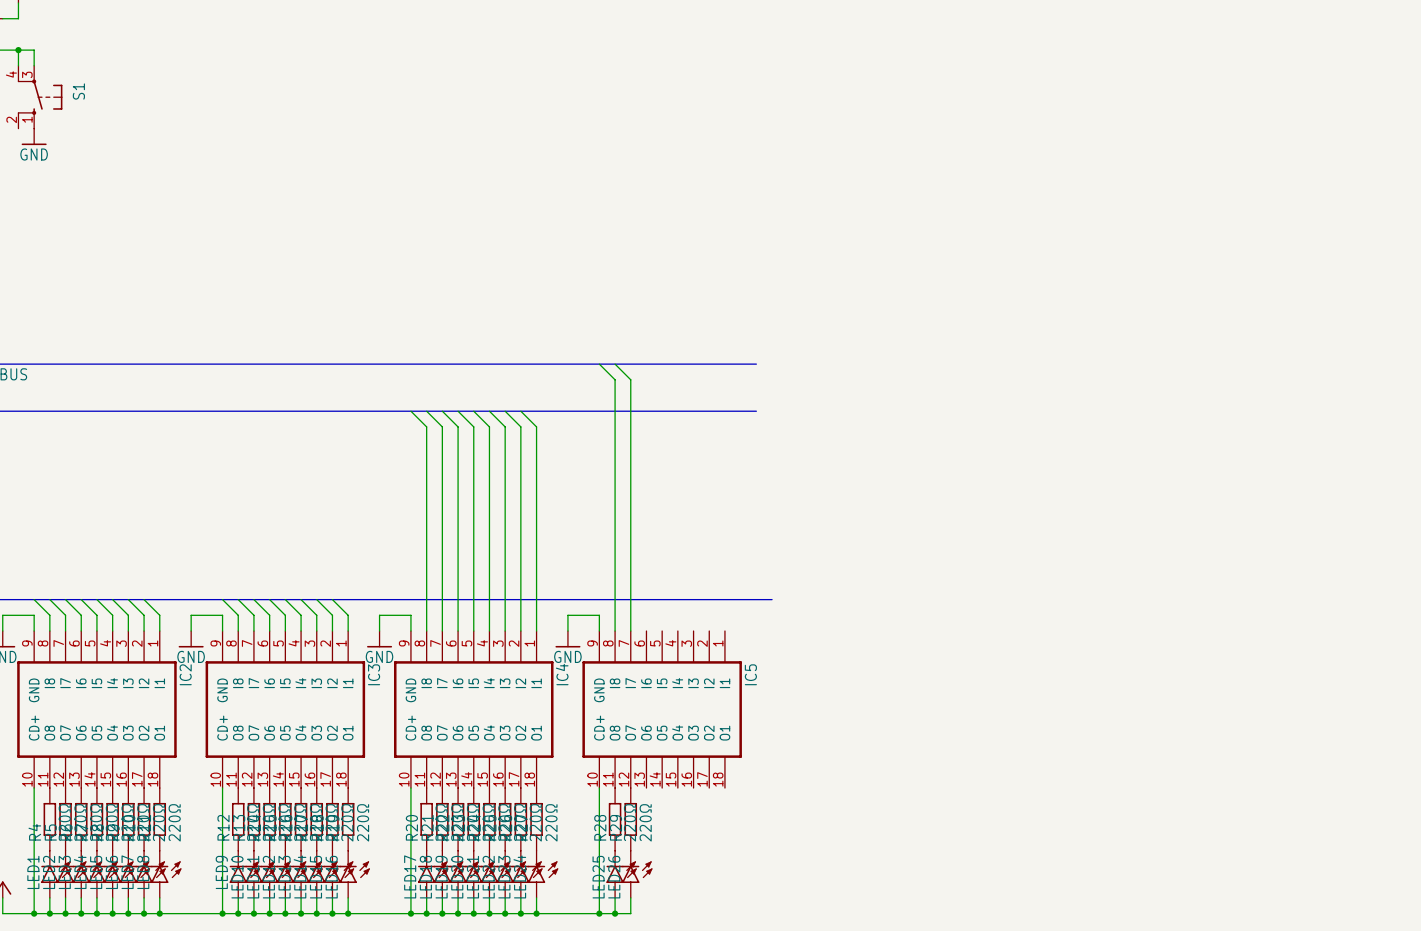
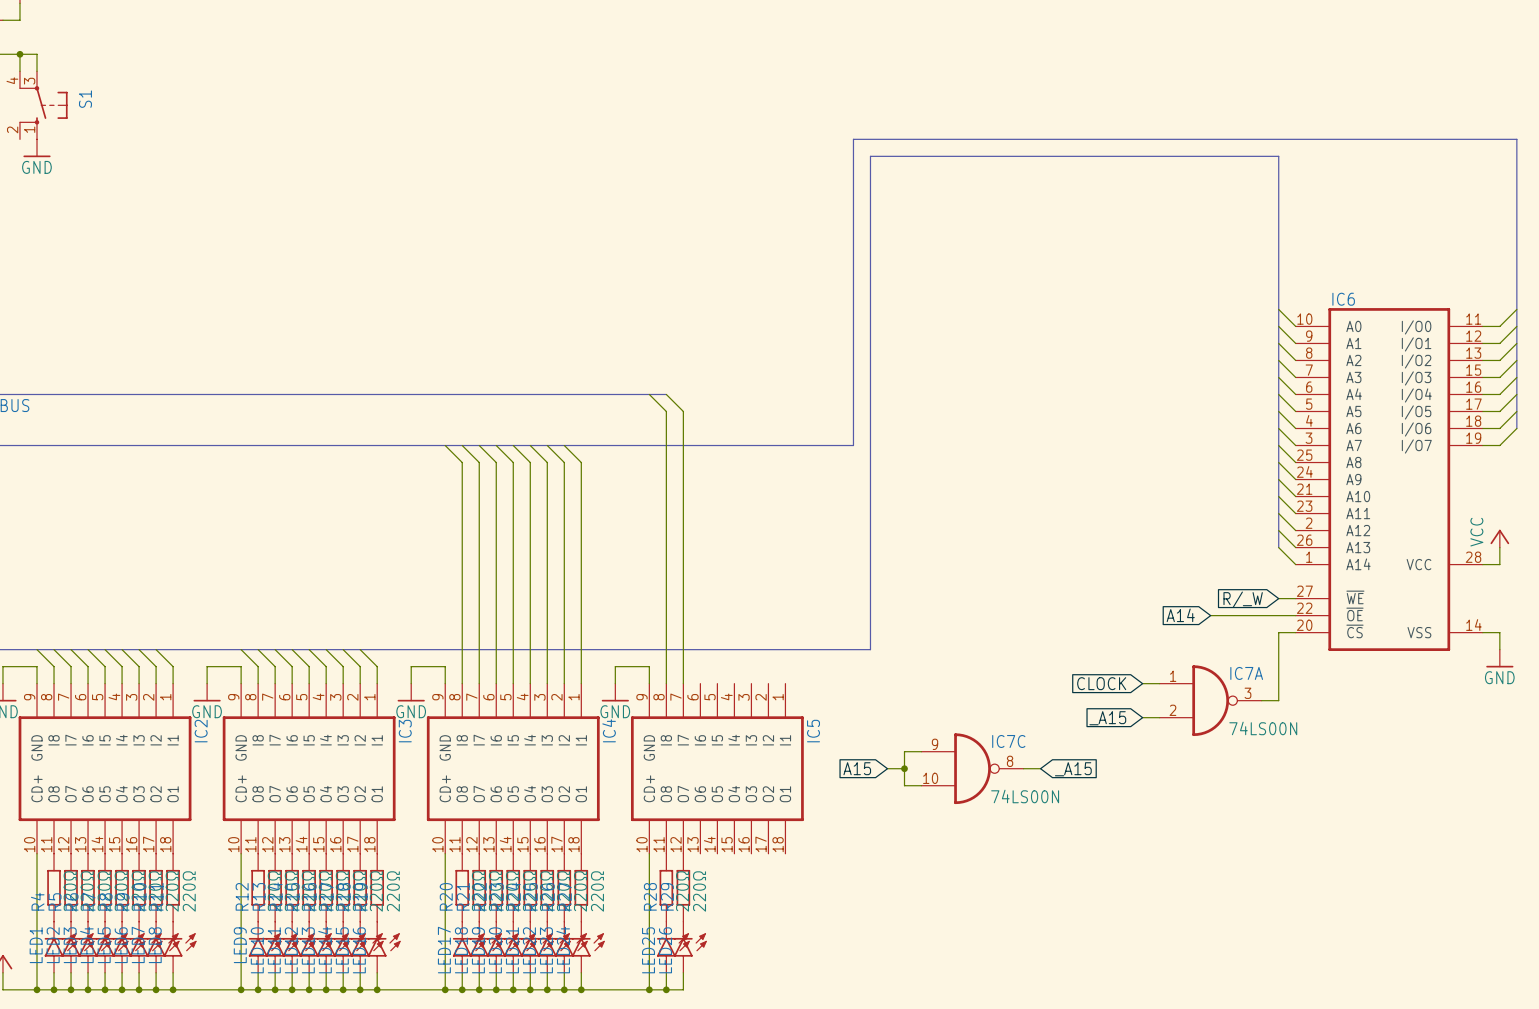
wire: none -> (1278, 309) (1295, 326)
wire: none -> (1516, 309) (1499, 326) (1482, 326)
wire: none -> (1278, 326) (1295, 343)
wire: none -> (1516, 326) (1499, 343) (1482, 343)
wire: none -> (1278, 343) (1295, 360)
wire: none -> (1516, 343) (1499, 360) (1482, 360)
wire: none -> (1278, 360) (1295, 377)
wire: none -> (1516, 360) (1499, 377) (1482, 377)
wire: none -> (1278, 377) (1295, 394)
wire: none -> (1516, 377) (1499, 394) (1482, 394)
bus: (615, 364) (756, 364) -> none
wire: none -> (1278, 394) (1295, 411)
wire: none -> (1516, 394) (1499, 411) (1482, 411)
wire: none -> (1278, 411) (1295, 428)
wire: none -> (1516, 411) (1499, 428) (1482, 428)
wire: none -> (1278, 428) (1295, 445)
bus: none -> (1516, 428) (1516, 139) (853, 139) (853, 445) (819, 445)
wire: none -> (1516, 428) (1499, 445) (1482, 445)
wire: none -> (1278, 445) (1295, 462)
wire: none -> (1278, 462) (1295, 479)
wire: none -> (1278, 479) (1295, 496)
IC6: none -> (1389, 479)
wire: none -> (1278, 496) (1295, 513)
wire: none -> (1278, 513) (1295, 530)
wire: none -> (1278, 530) (1295, 547)
power symbol: none -> VCC (1499, 538)
bus: none -> (1278, 547) (1278, 156) (870, 156) (870, 649) (836, 649)
wire: none -> (1278, 547) (1295, 564)
wire: none -> (1499, 547) (1499, 564) (1482, 564)
wire: none -> (1278, 598) (1295, 598)
global label: none -> R/_W (1243, 599)
global label: none -> A14 (1180, 615)
wire: none -> (1210, 615) (1295, 615)
wire: none -> (1295, 632) (1278, 632) (1278, 700) (1261, 700)
wire: none -> (1482, 632) (1499, 632) (1499, 649)
power symbol: none -> GND (1499, 658)
global label: none -> CLOCK (1101, 683)
wire: none -> (1142, 683) (1159, 683)
IC7A: none -> 74LS00N (1210, 700)
global label: none -> _A15 (1107, 718)
wire: none -> (1142, 717) (1159, 717)
wire: none -> (921, 751) (904, 751) (904, 785) (921, 785)
global label: none -> A15 (857, 768)
wire: none -> (887, 768) (904, 768)
junction: none -> (904, 768)
IC7C: none -> 74LS00N (972, 768)
wire: none -> (1023, 768) (1040, 768)
global label: none -> _A15 (1073, 769)

